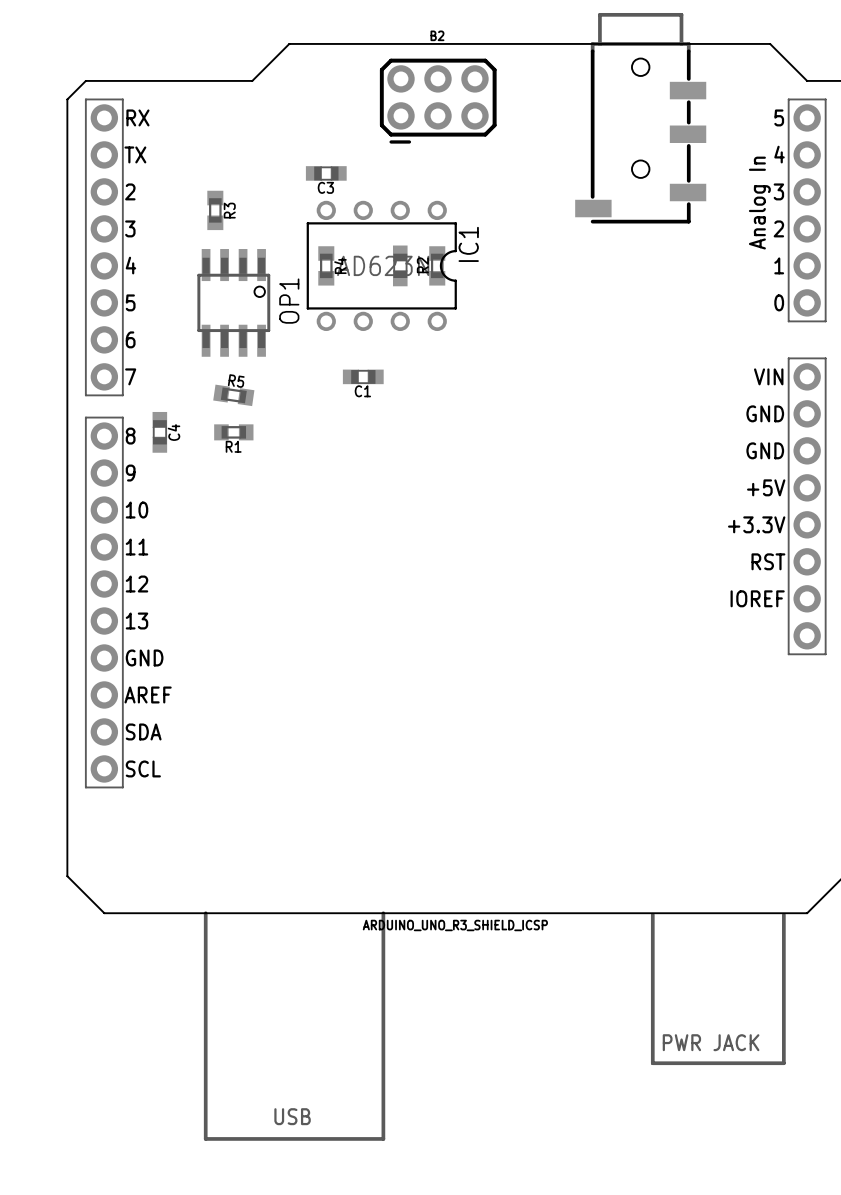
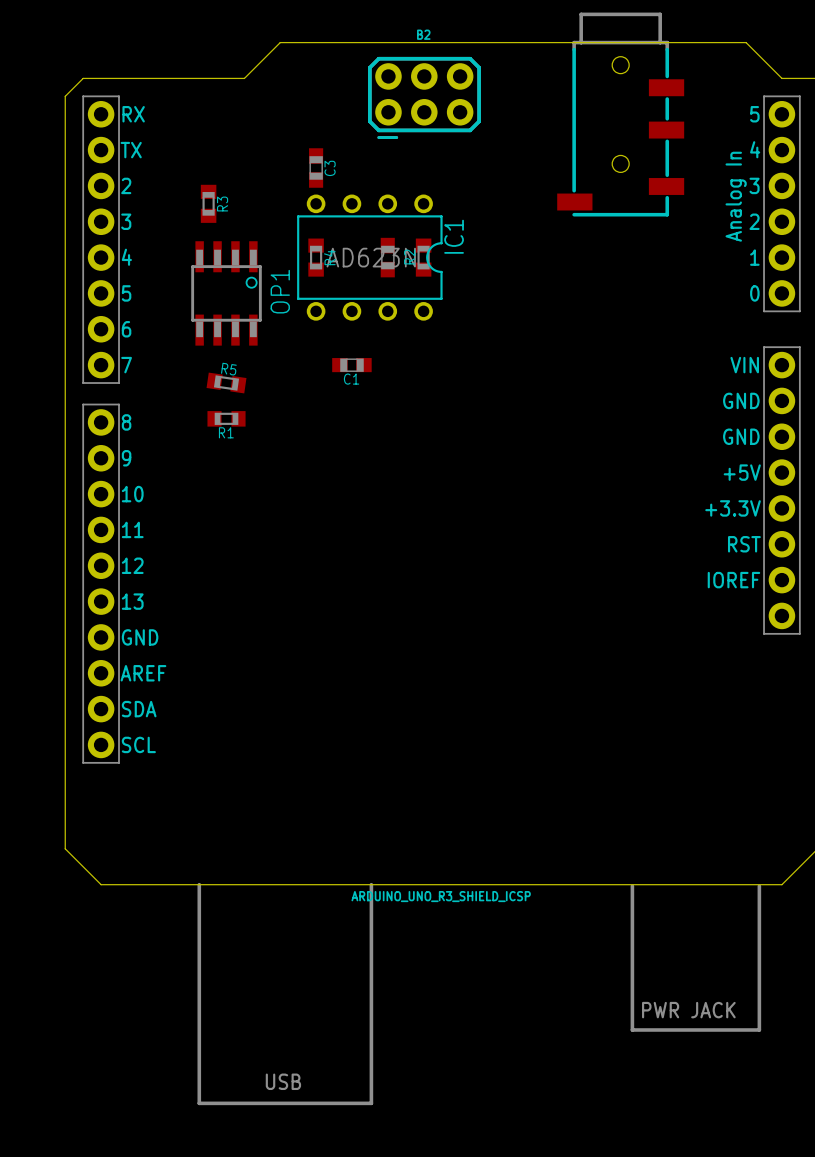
C3 rotation: 0° (326, 173) -> 90° clockwise (316, 168)
C4: (159, 432) -> none

